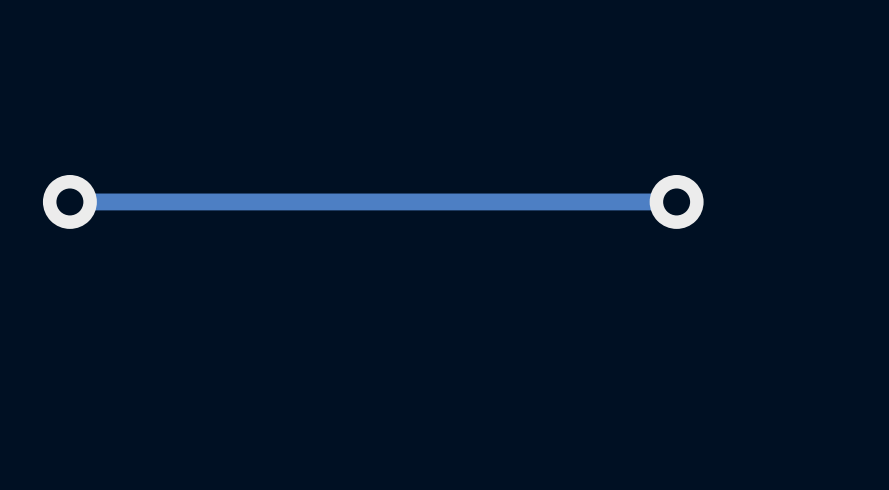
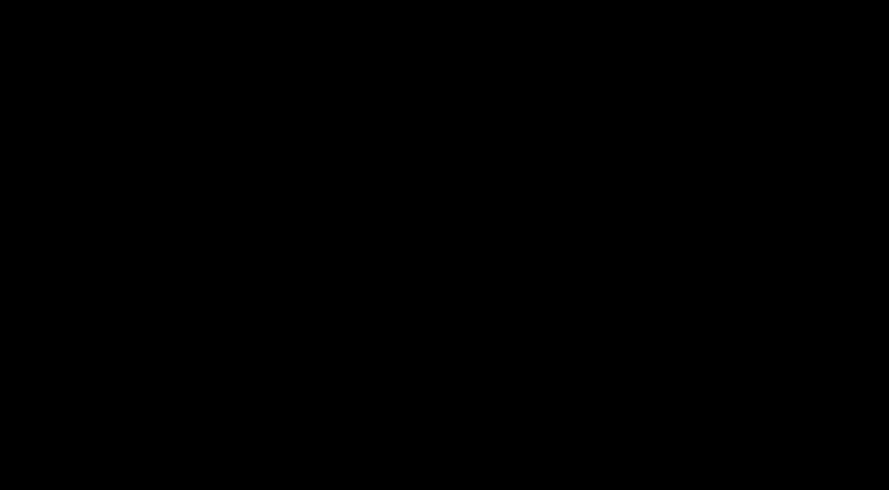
via: (69, 201) -> none
track: (676, 201) (69, 201) -> none
via: (676, 201) -> none

